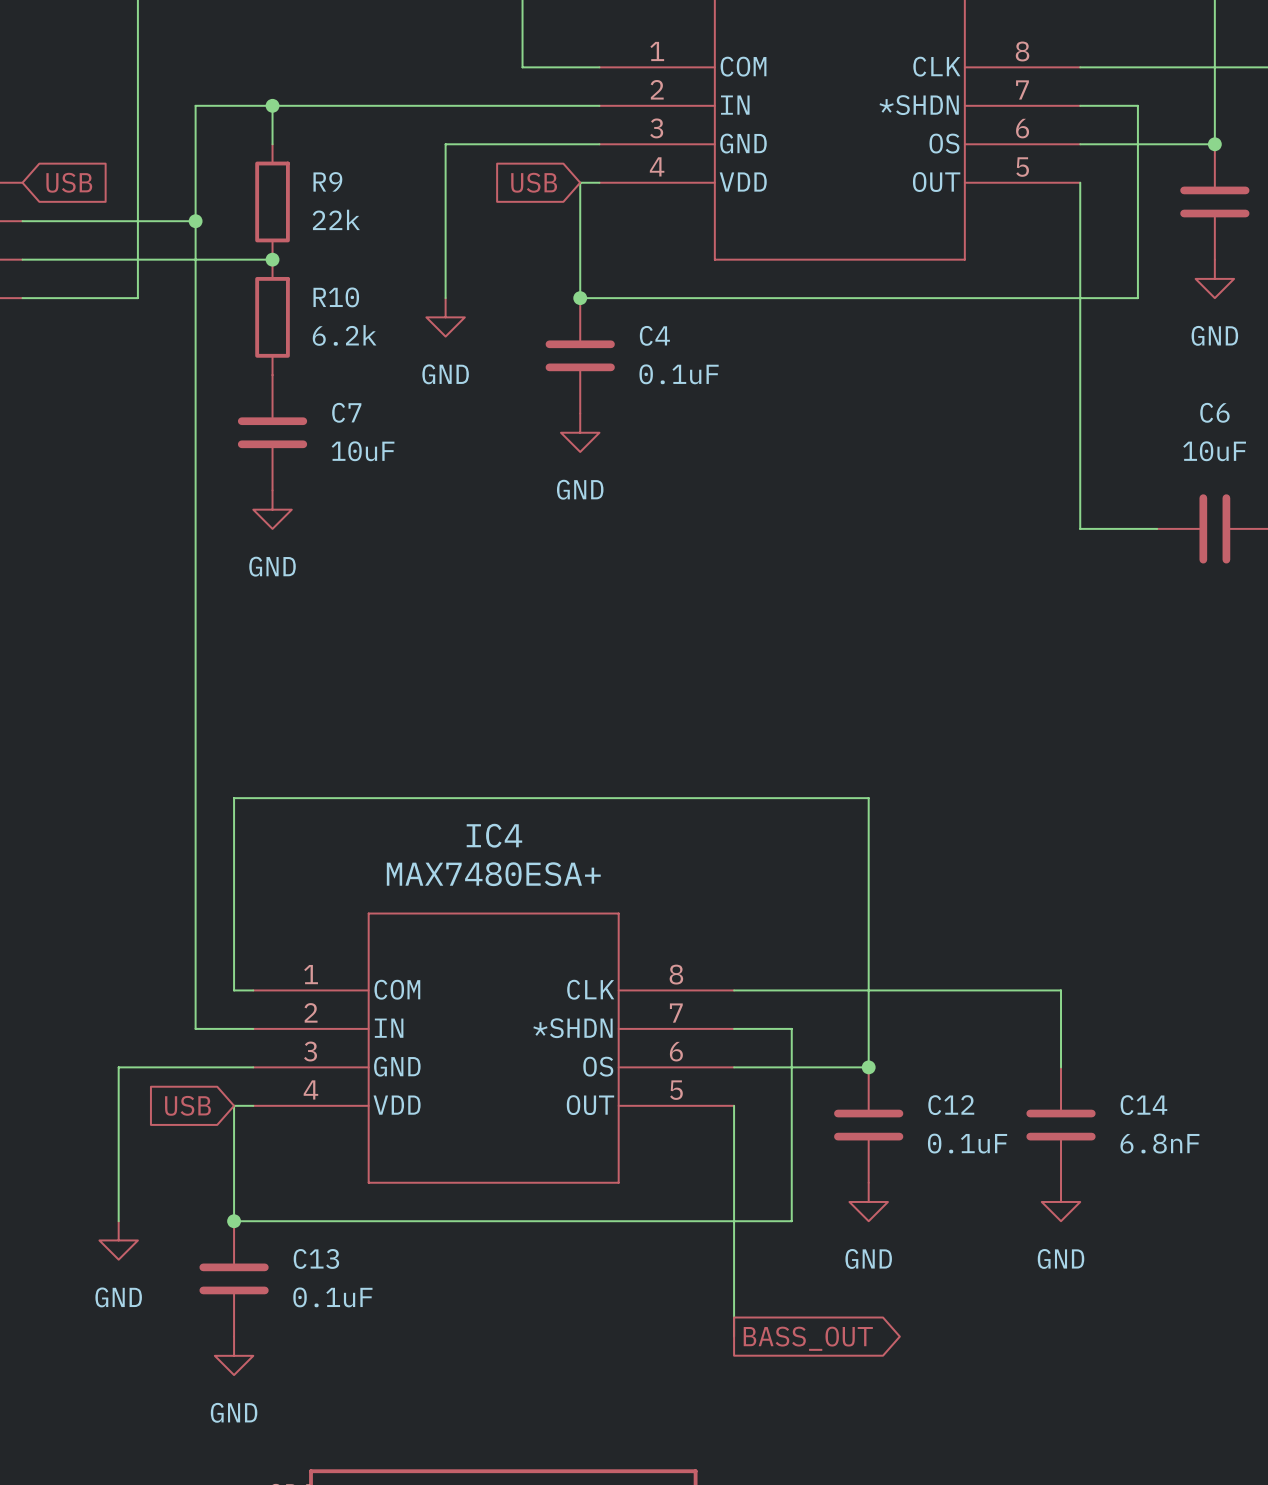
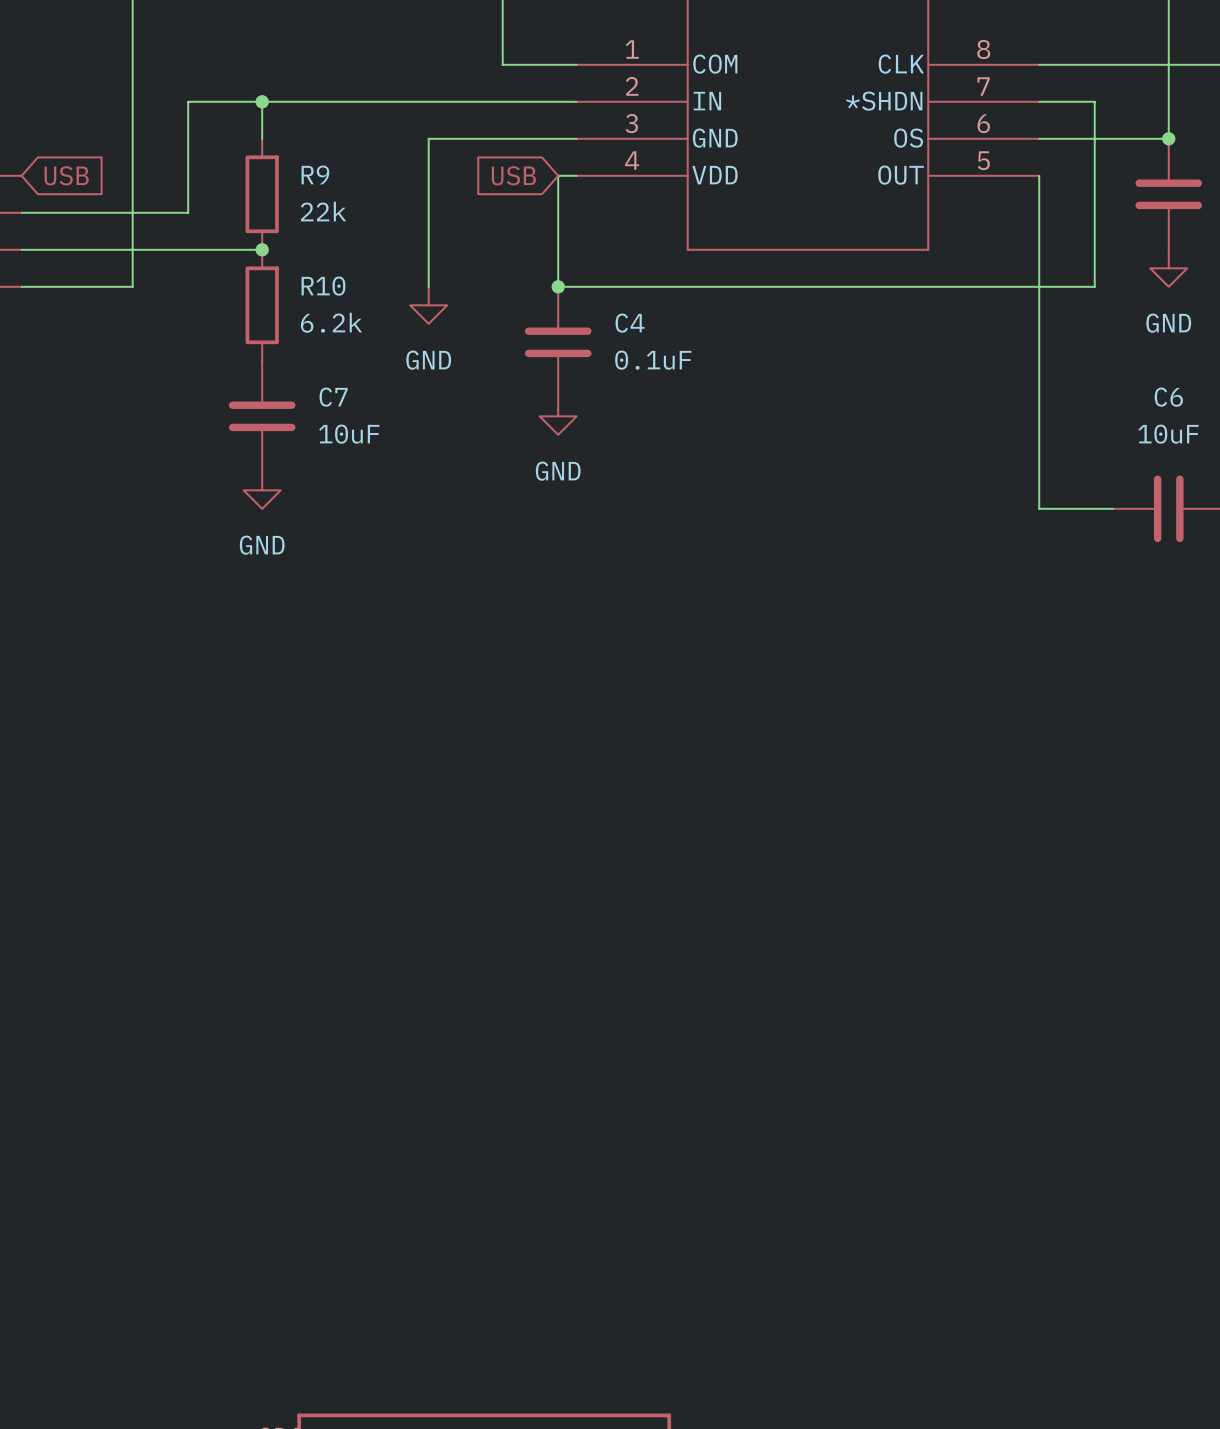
wire: (195, 221) (195, 1028) (253, 1028) -> none
junction: (195, 221) -> none
wire: (253, 990) (234, 990) (234, 798) (868, 798) (868, 1067) (734, 1067) -> none
wire: (734, 990) (1061, 990) (1061, 1067) -> none
wire: (734, 1028) (791, 1028) (791, 1221) (234, 1221) (234, 1105) (253, 1105) -> none
IC4: MAX7480ESA+ (493, 1048) -> none
wire: (253, 1067) (118, 1067) (118, 1221) -> none
junction: (868, 1067) -> none
global label: USB (187, 1105) -> none
wire: (734, 1105) (734, 1336) -> none
C12: 0.1uF (868, 1125) -> none
C14: 6.8nF (1061, 1125) -> none
power symbol: GND (868, 1201) -> none
power symbol: GND (1061, 1201) -> none
junction: (234, 1221) -> none
power symbol: GND (118, 1240) -> none
C13: 0.1uF (234, 1278) -> none
global label: BASS_OUT (808, 1338) -> none
power symbol: GND (234, 1355) -> none

